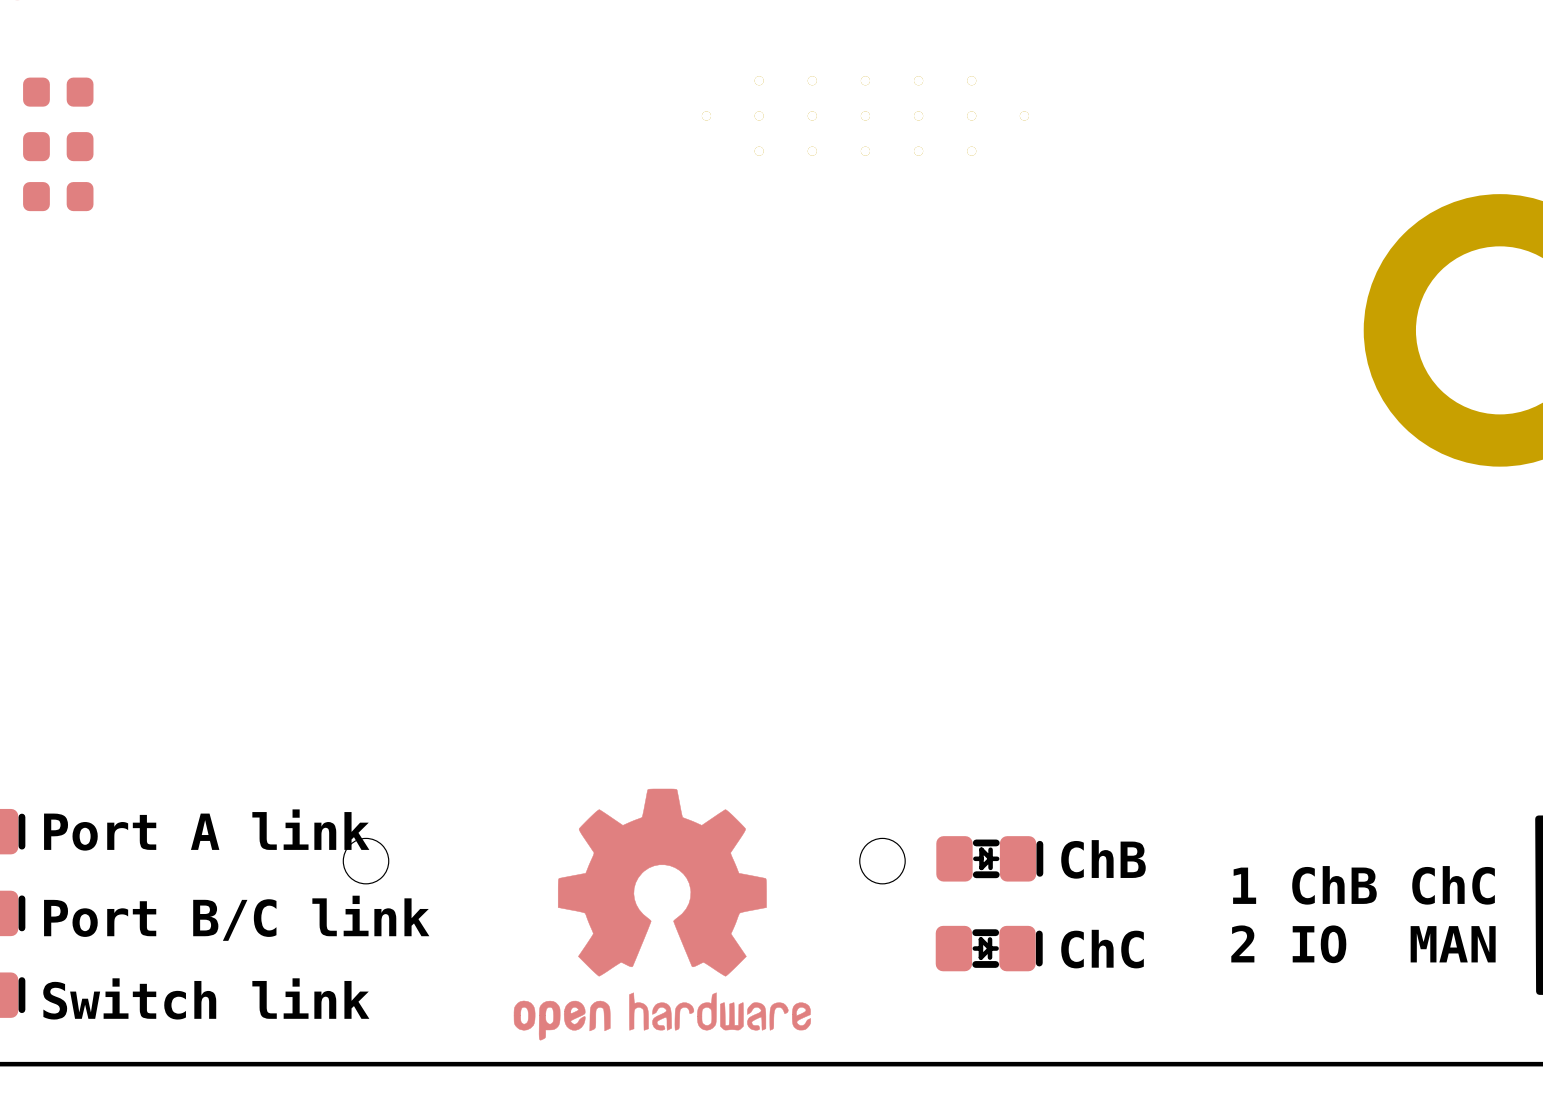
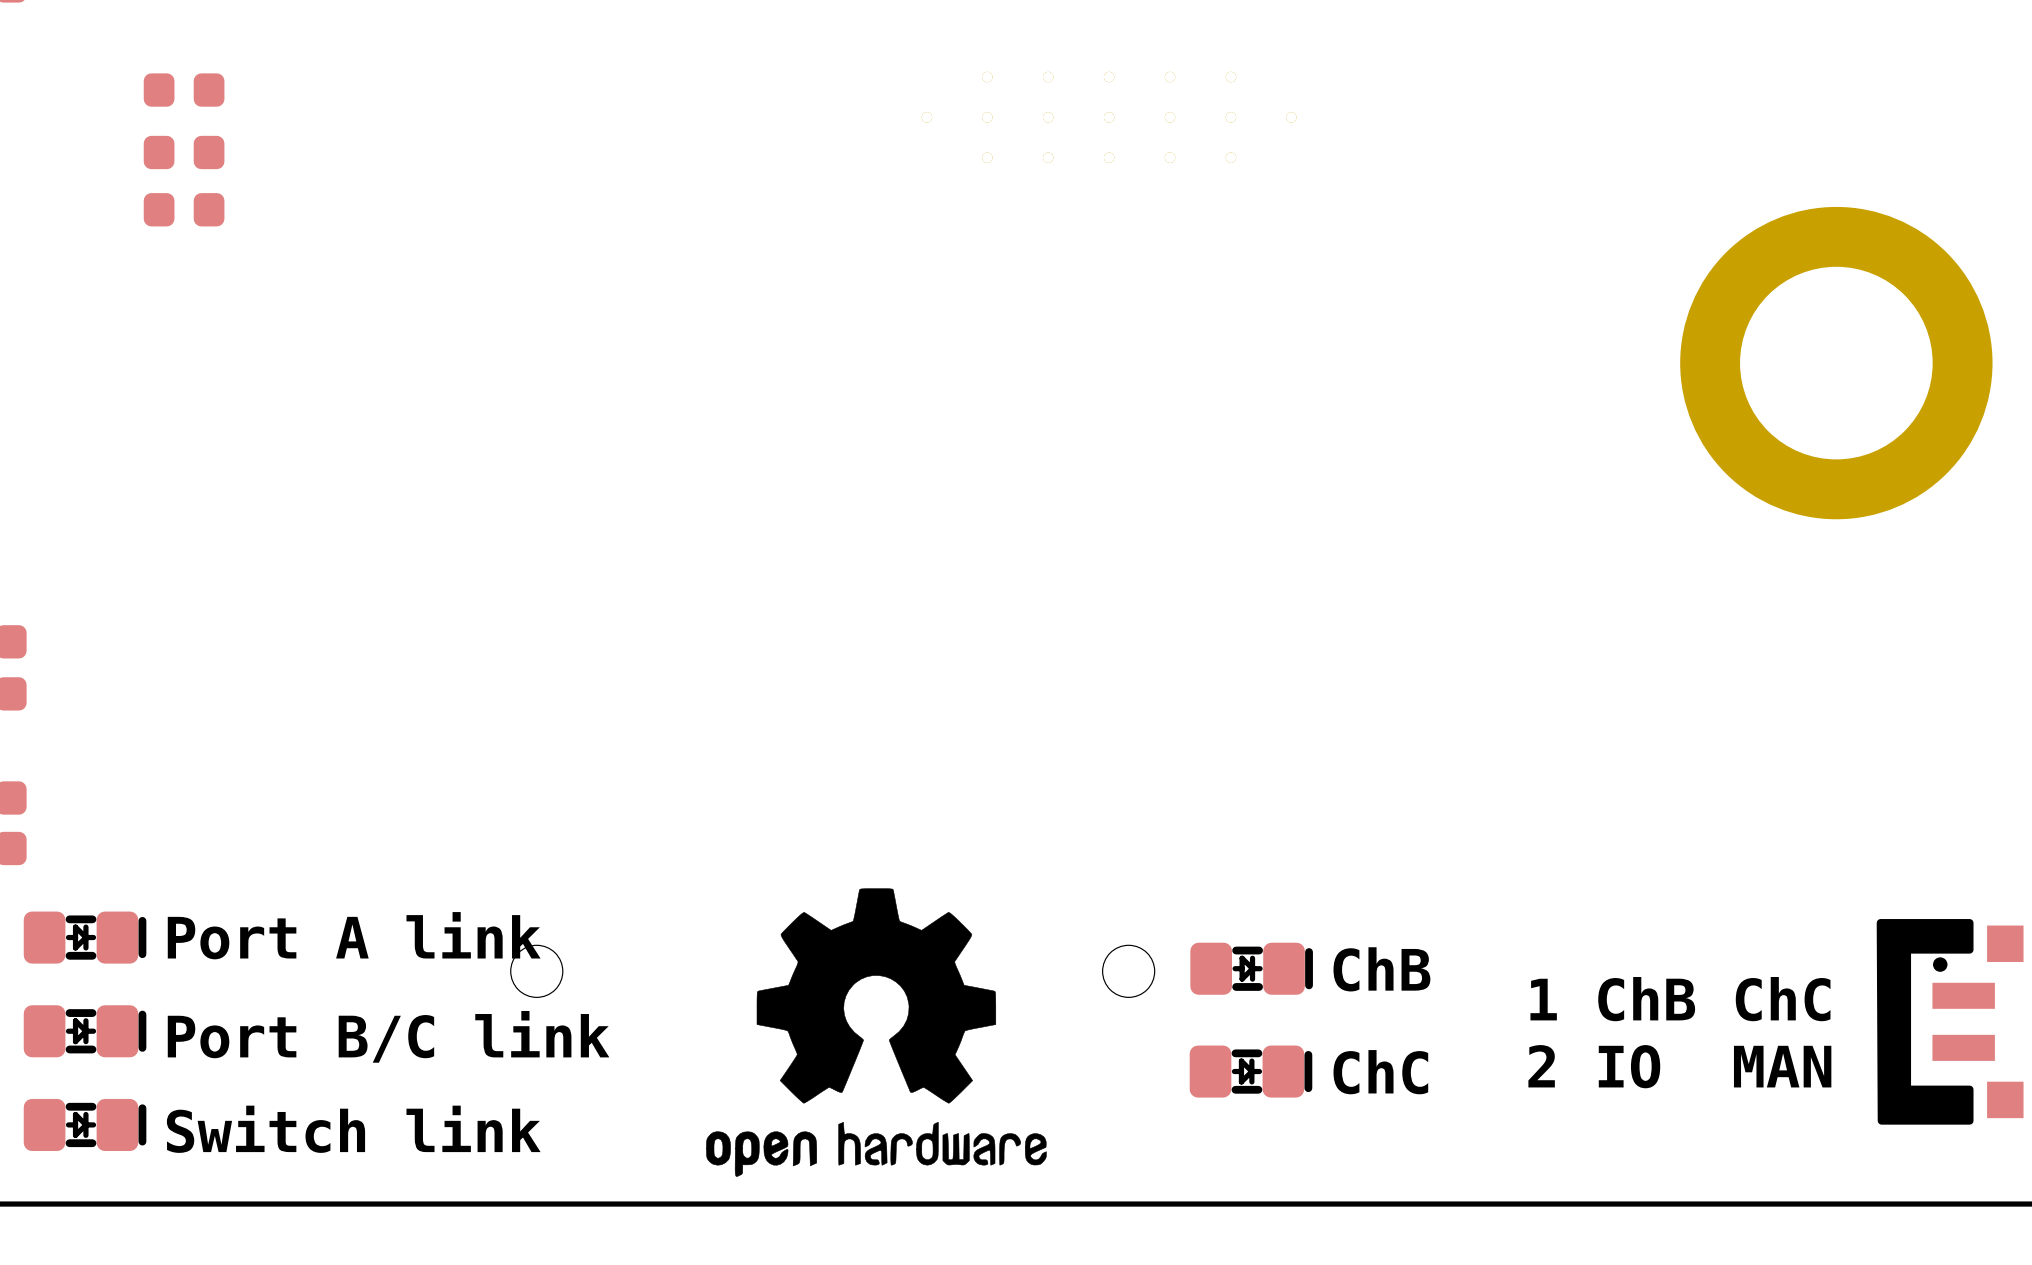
drawing shape: [513, 788, 811, 1041] -> [706, 888, 1047, 1177]

